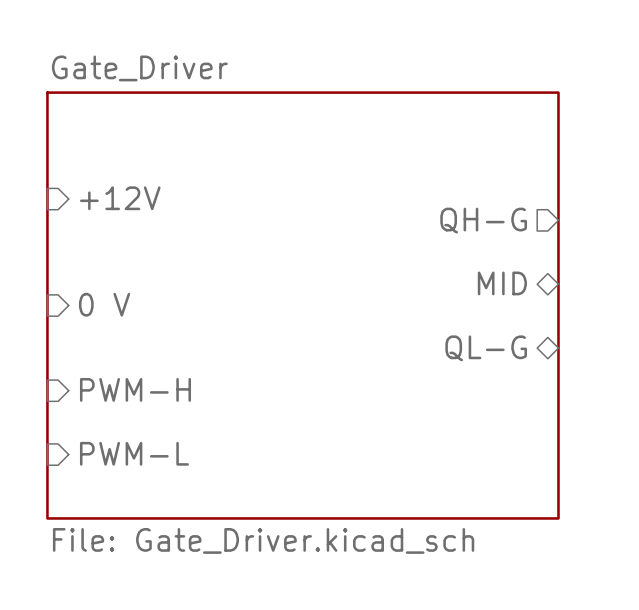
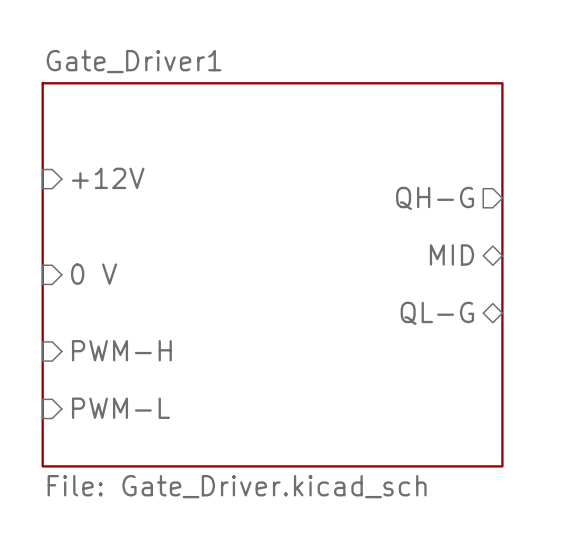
sheet Gate_Driver name: Gate_Driver (139, 68) -> Gate_Driver1 (134, 61)

